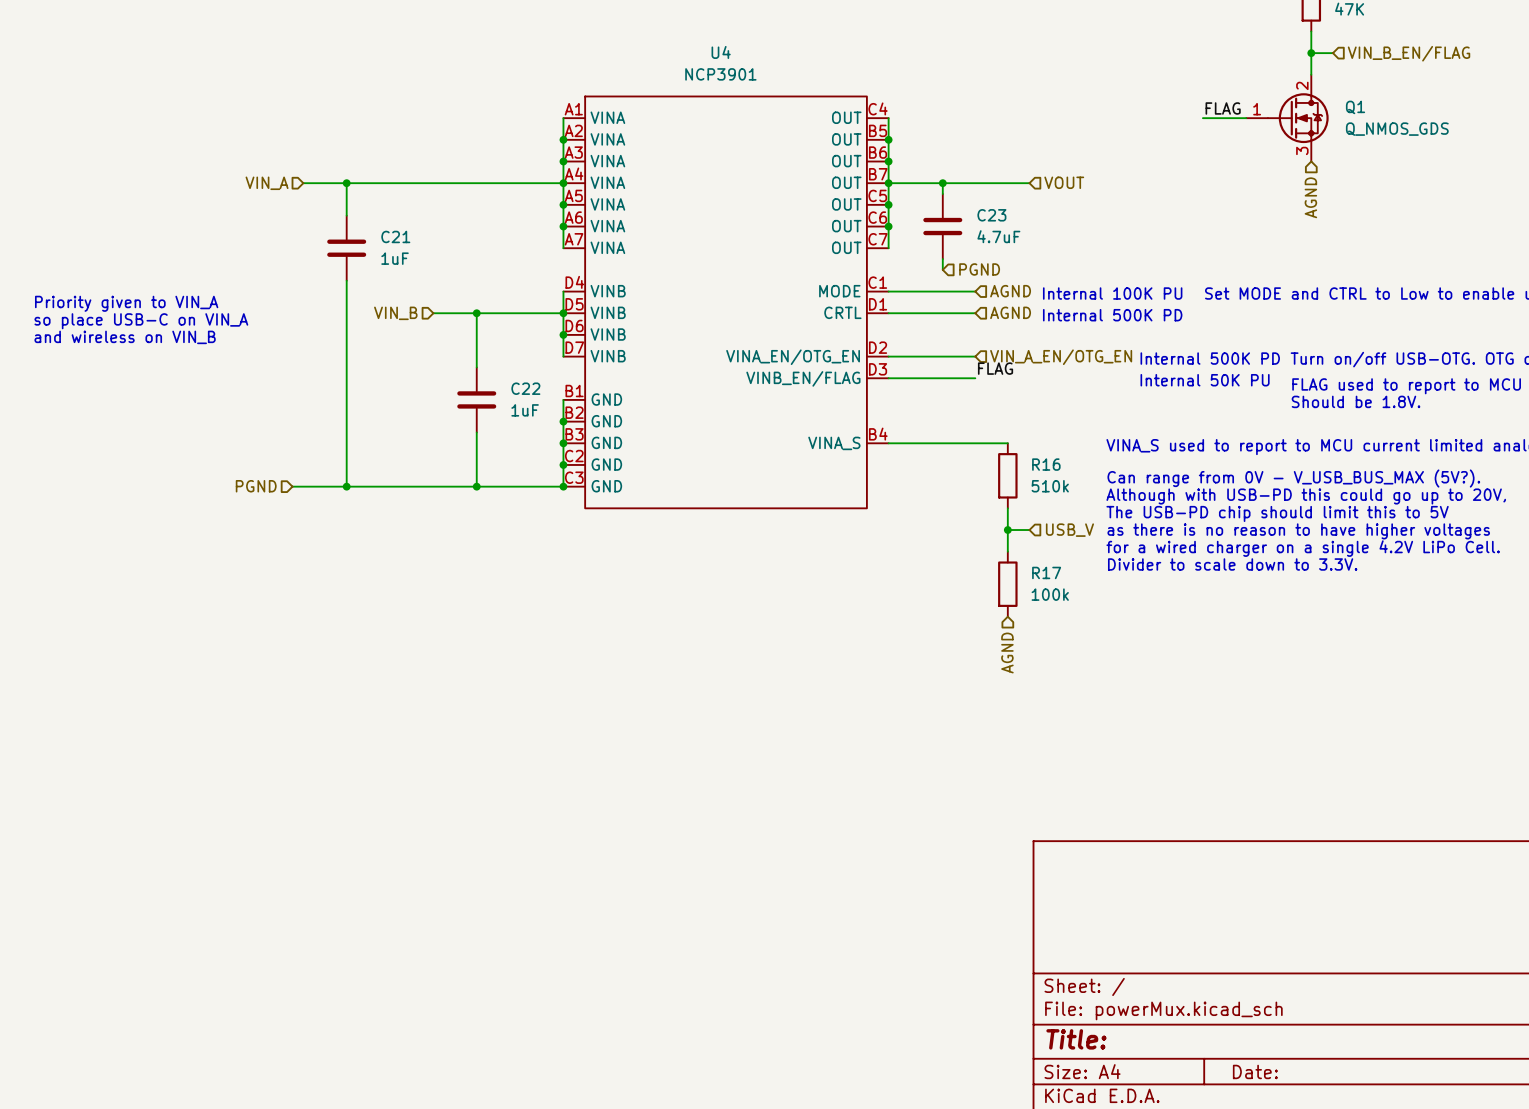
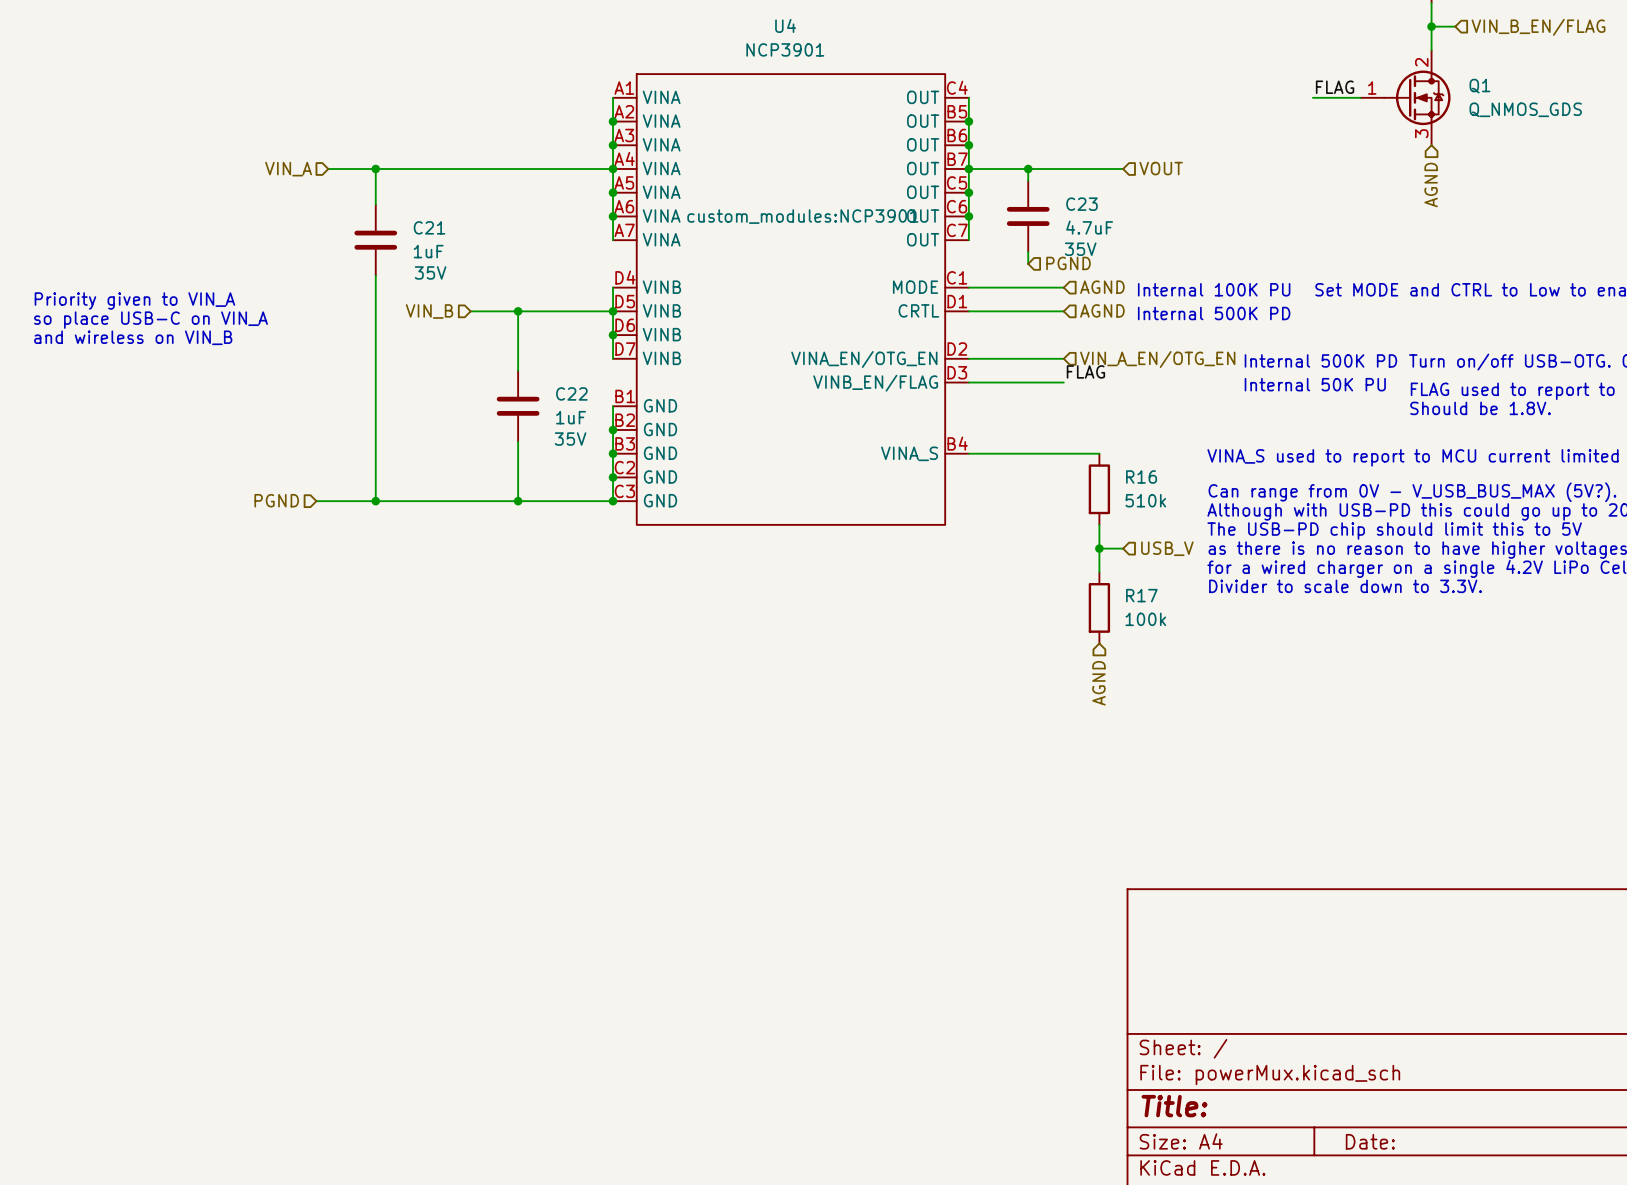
U4 text: none -> custom_modules:NCP3901 (802, 216)
C23 text: none -> 35V (1080, 249)
C21 text: none -> 35V (430, 272)
C22 text: none -> 35V (570, 439)

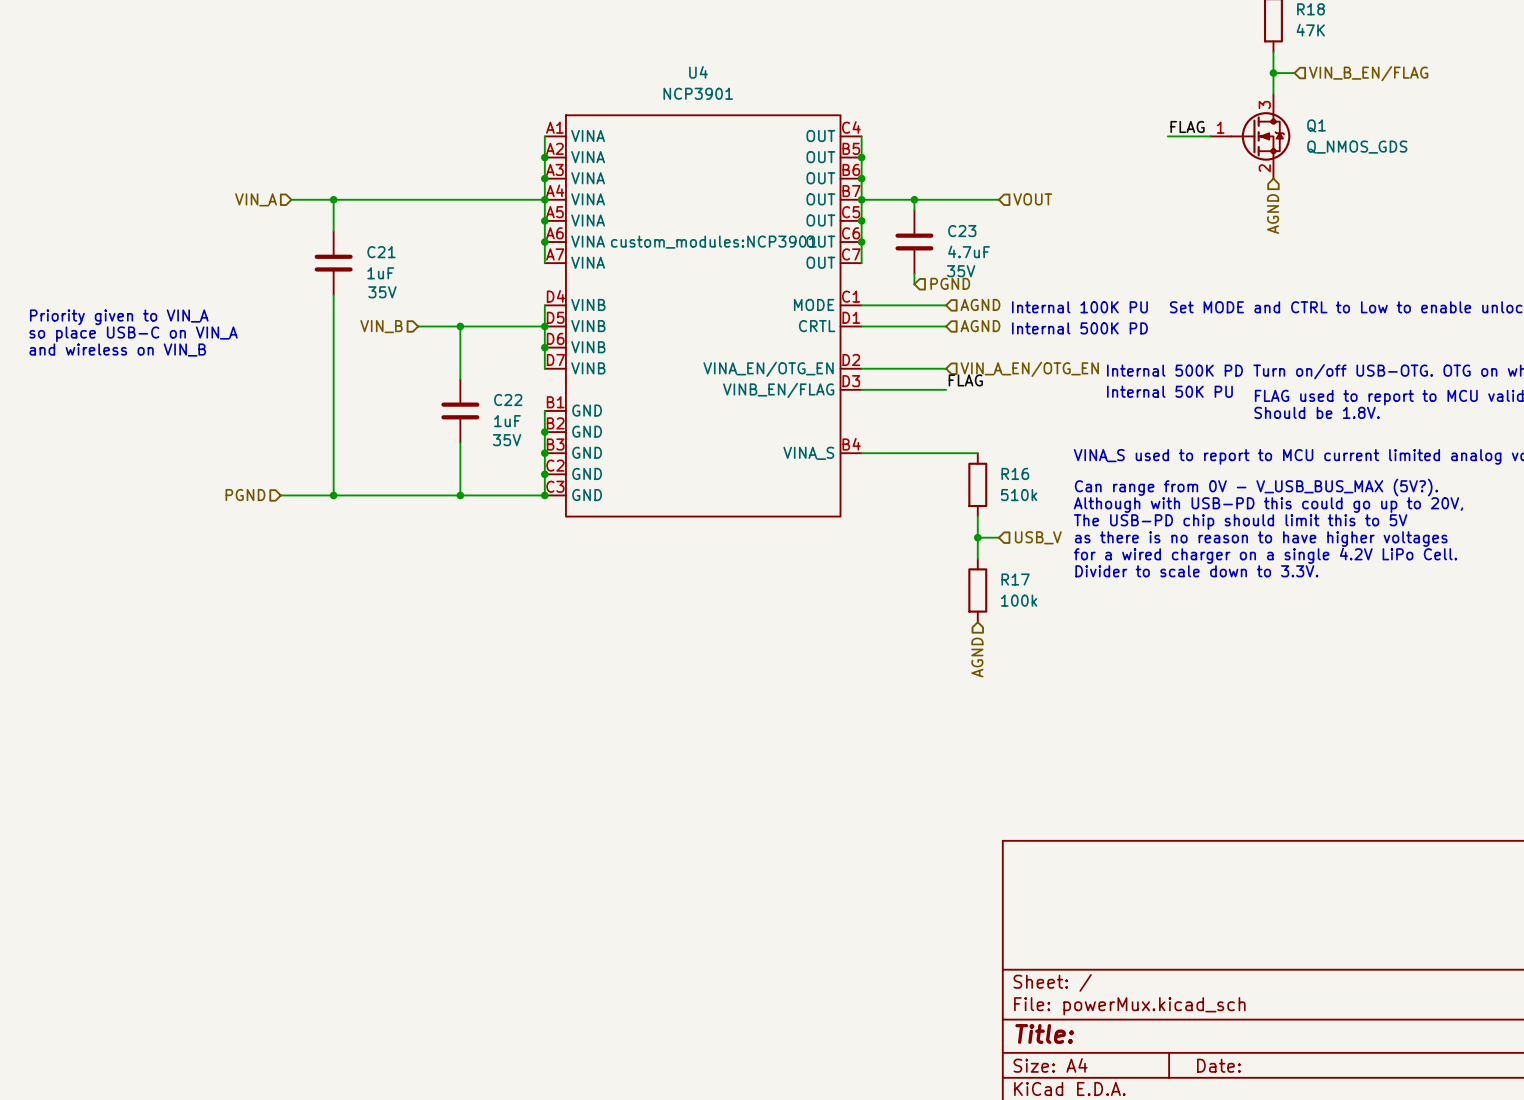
Q1 pin number: 2 (1421, 62) -> 3 (1264, 104)
Q1 pin number: 3 (1421, 133) -> 2 (1264, 168)

